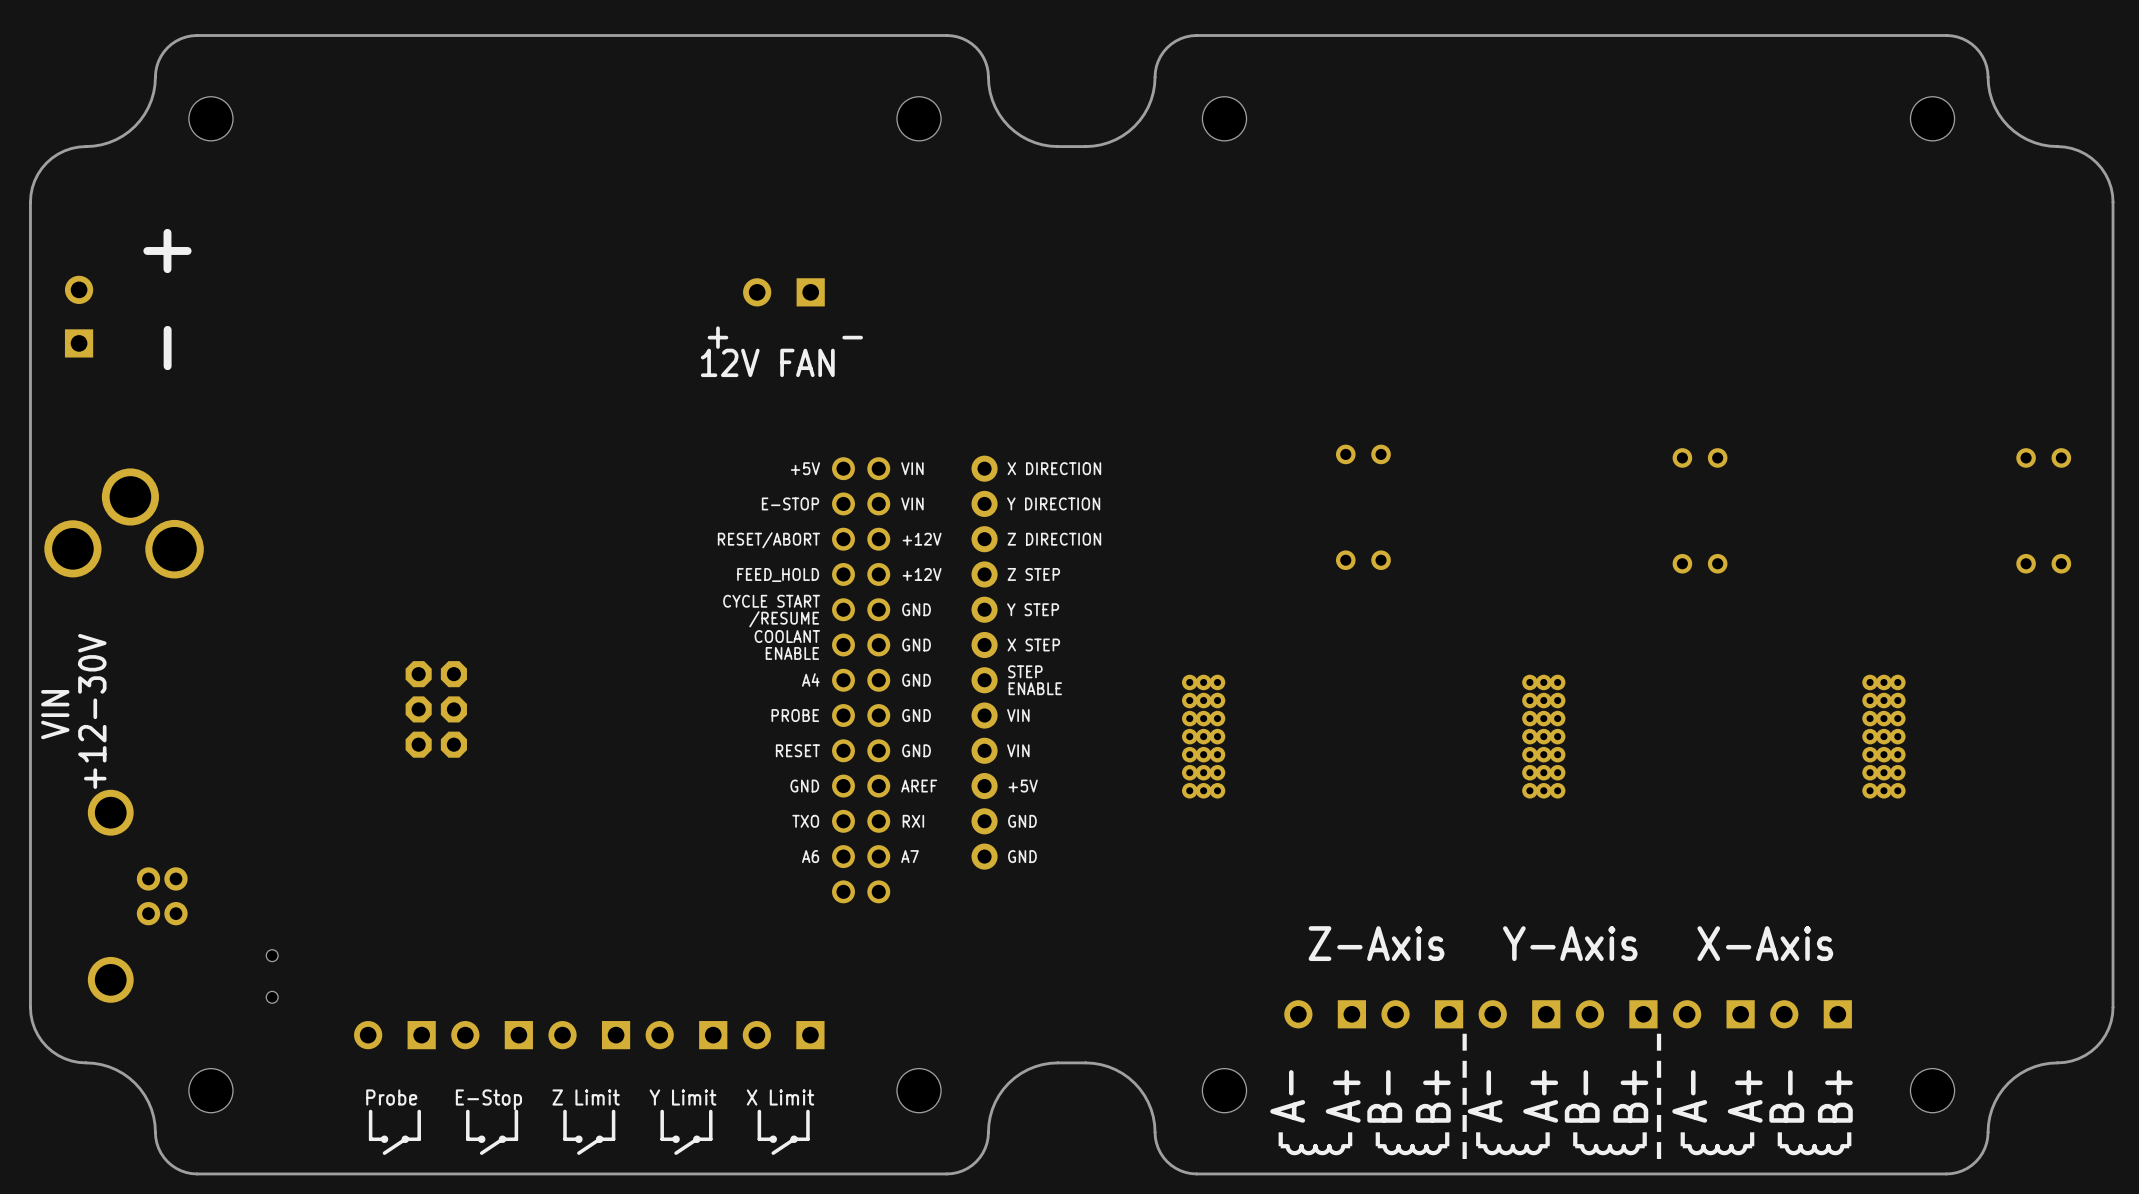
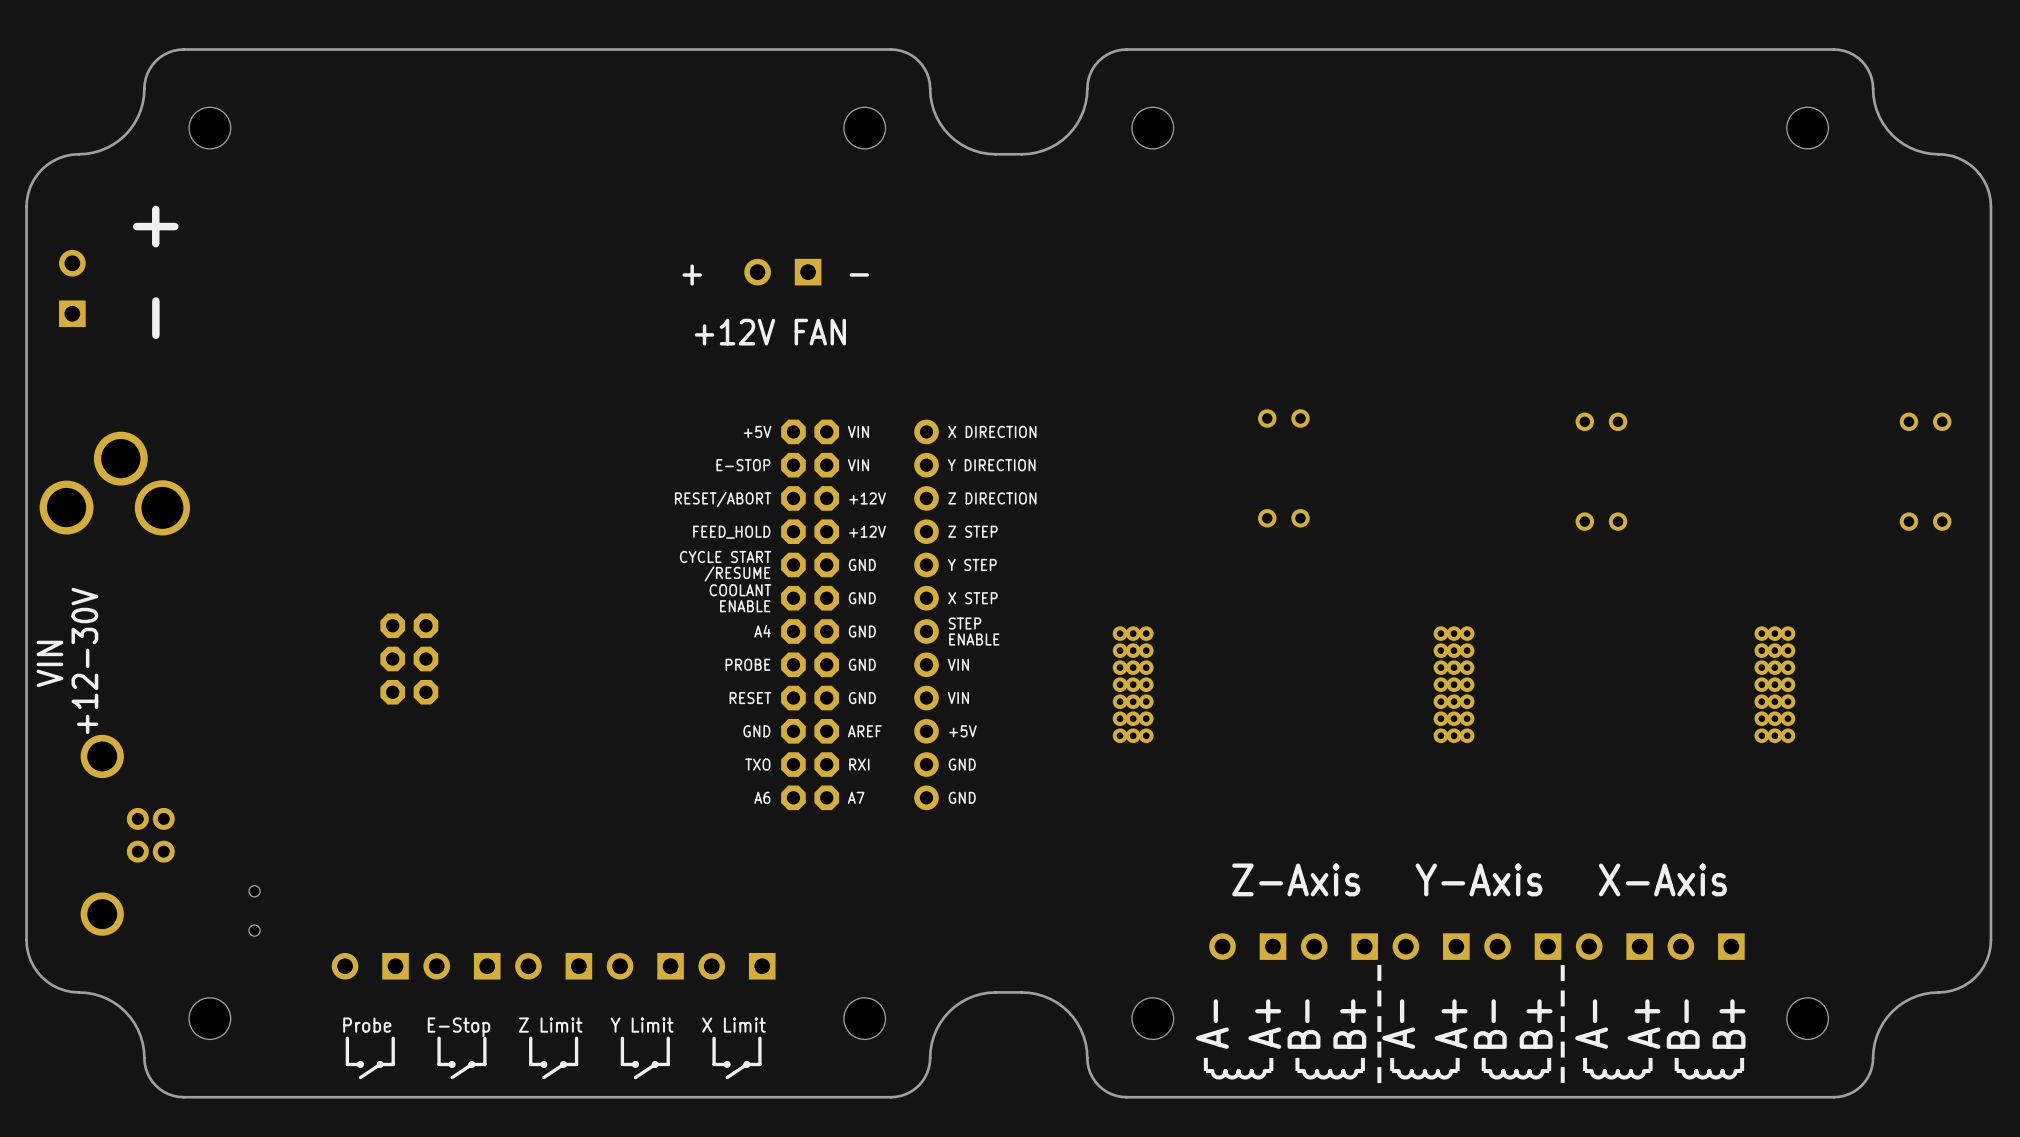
part footprint: [29, 34, 2115, 1176] -> [25, 48, 1993, 1099]
part position: (783, 292) -> (782, 272)
text position: + (717, 337) -> + (692, 275)
text position: - (852, 337) -> - (859, 274)
text: 12V FAN (767, 362) -> +12V FAN (770, 332)
part: none -> (810, 515)
part: (861, 680) -> none
part: none -> (810, 714)

